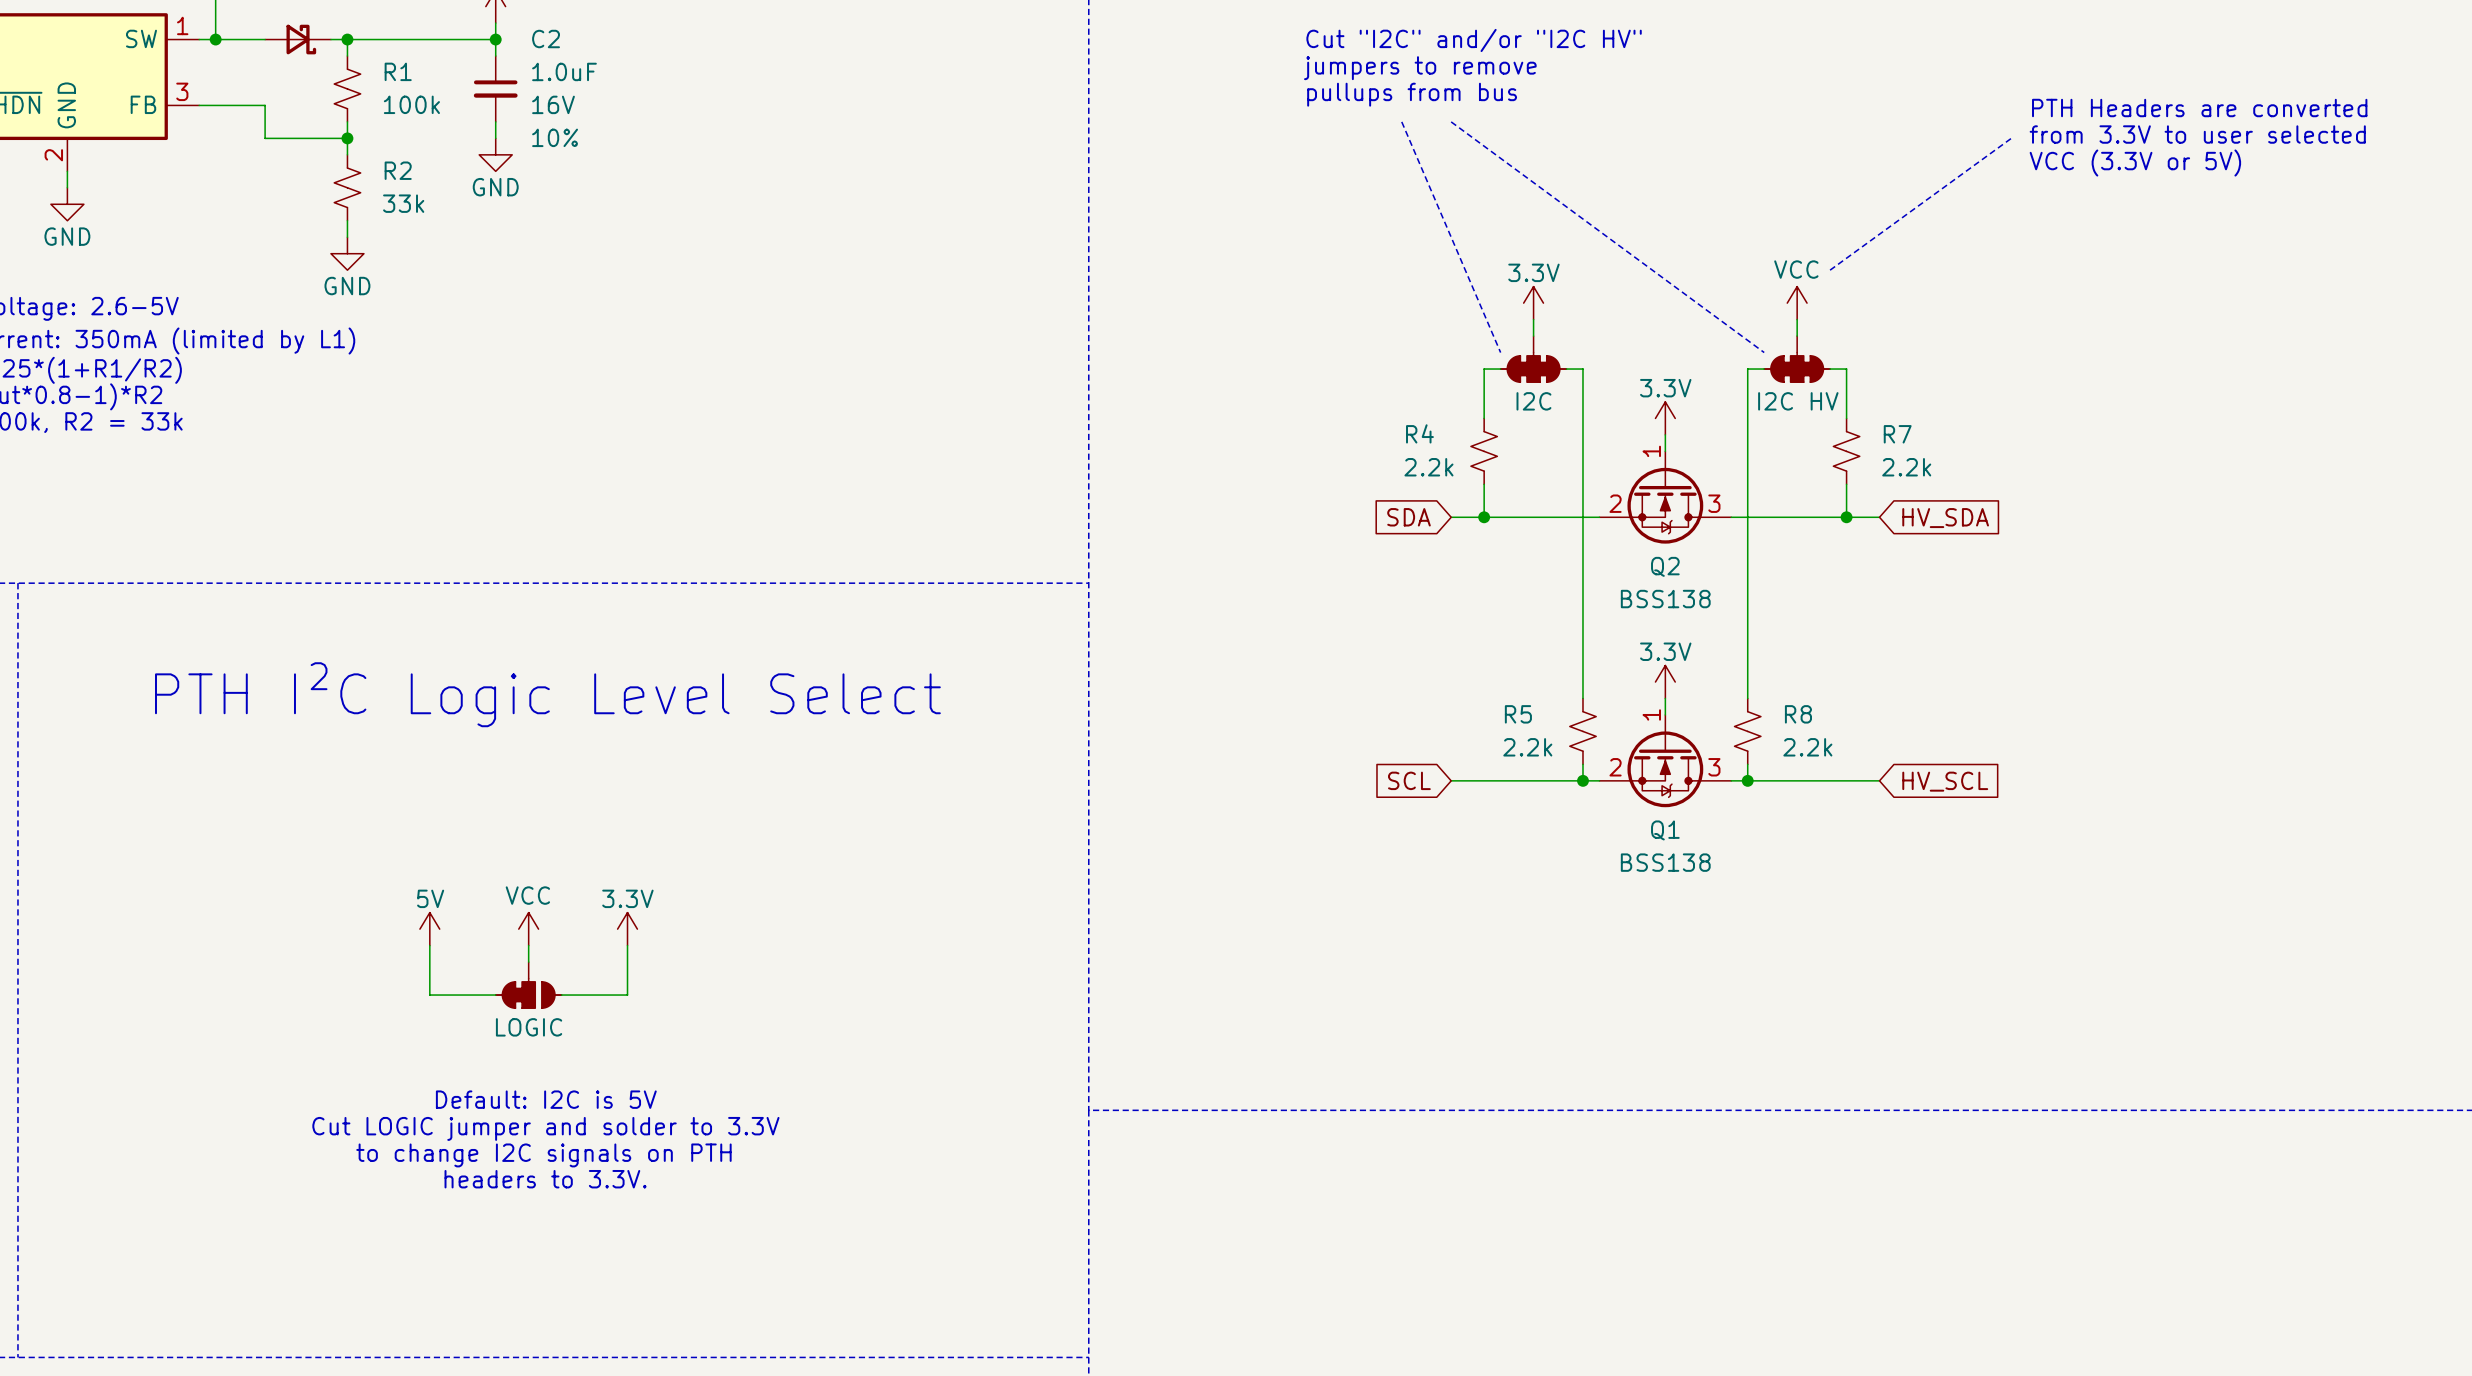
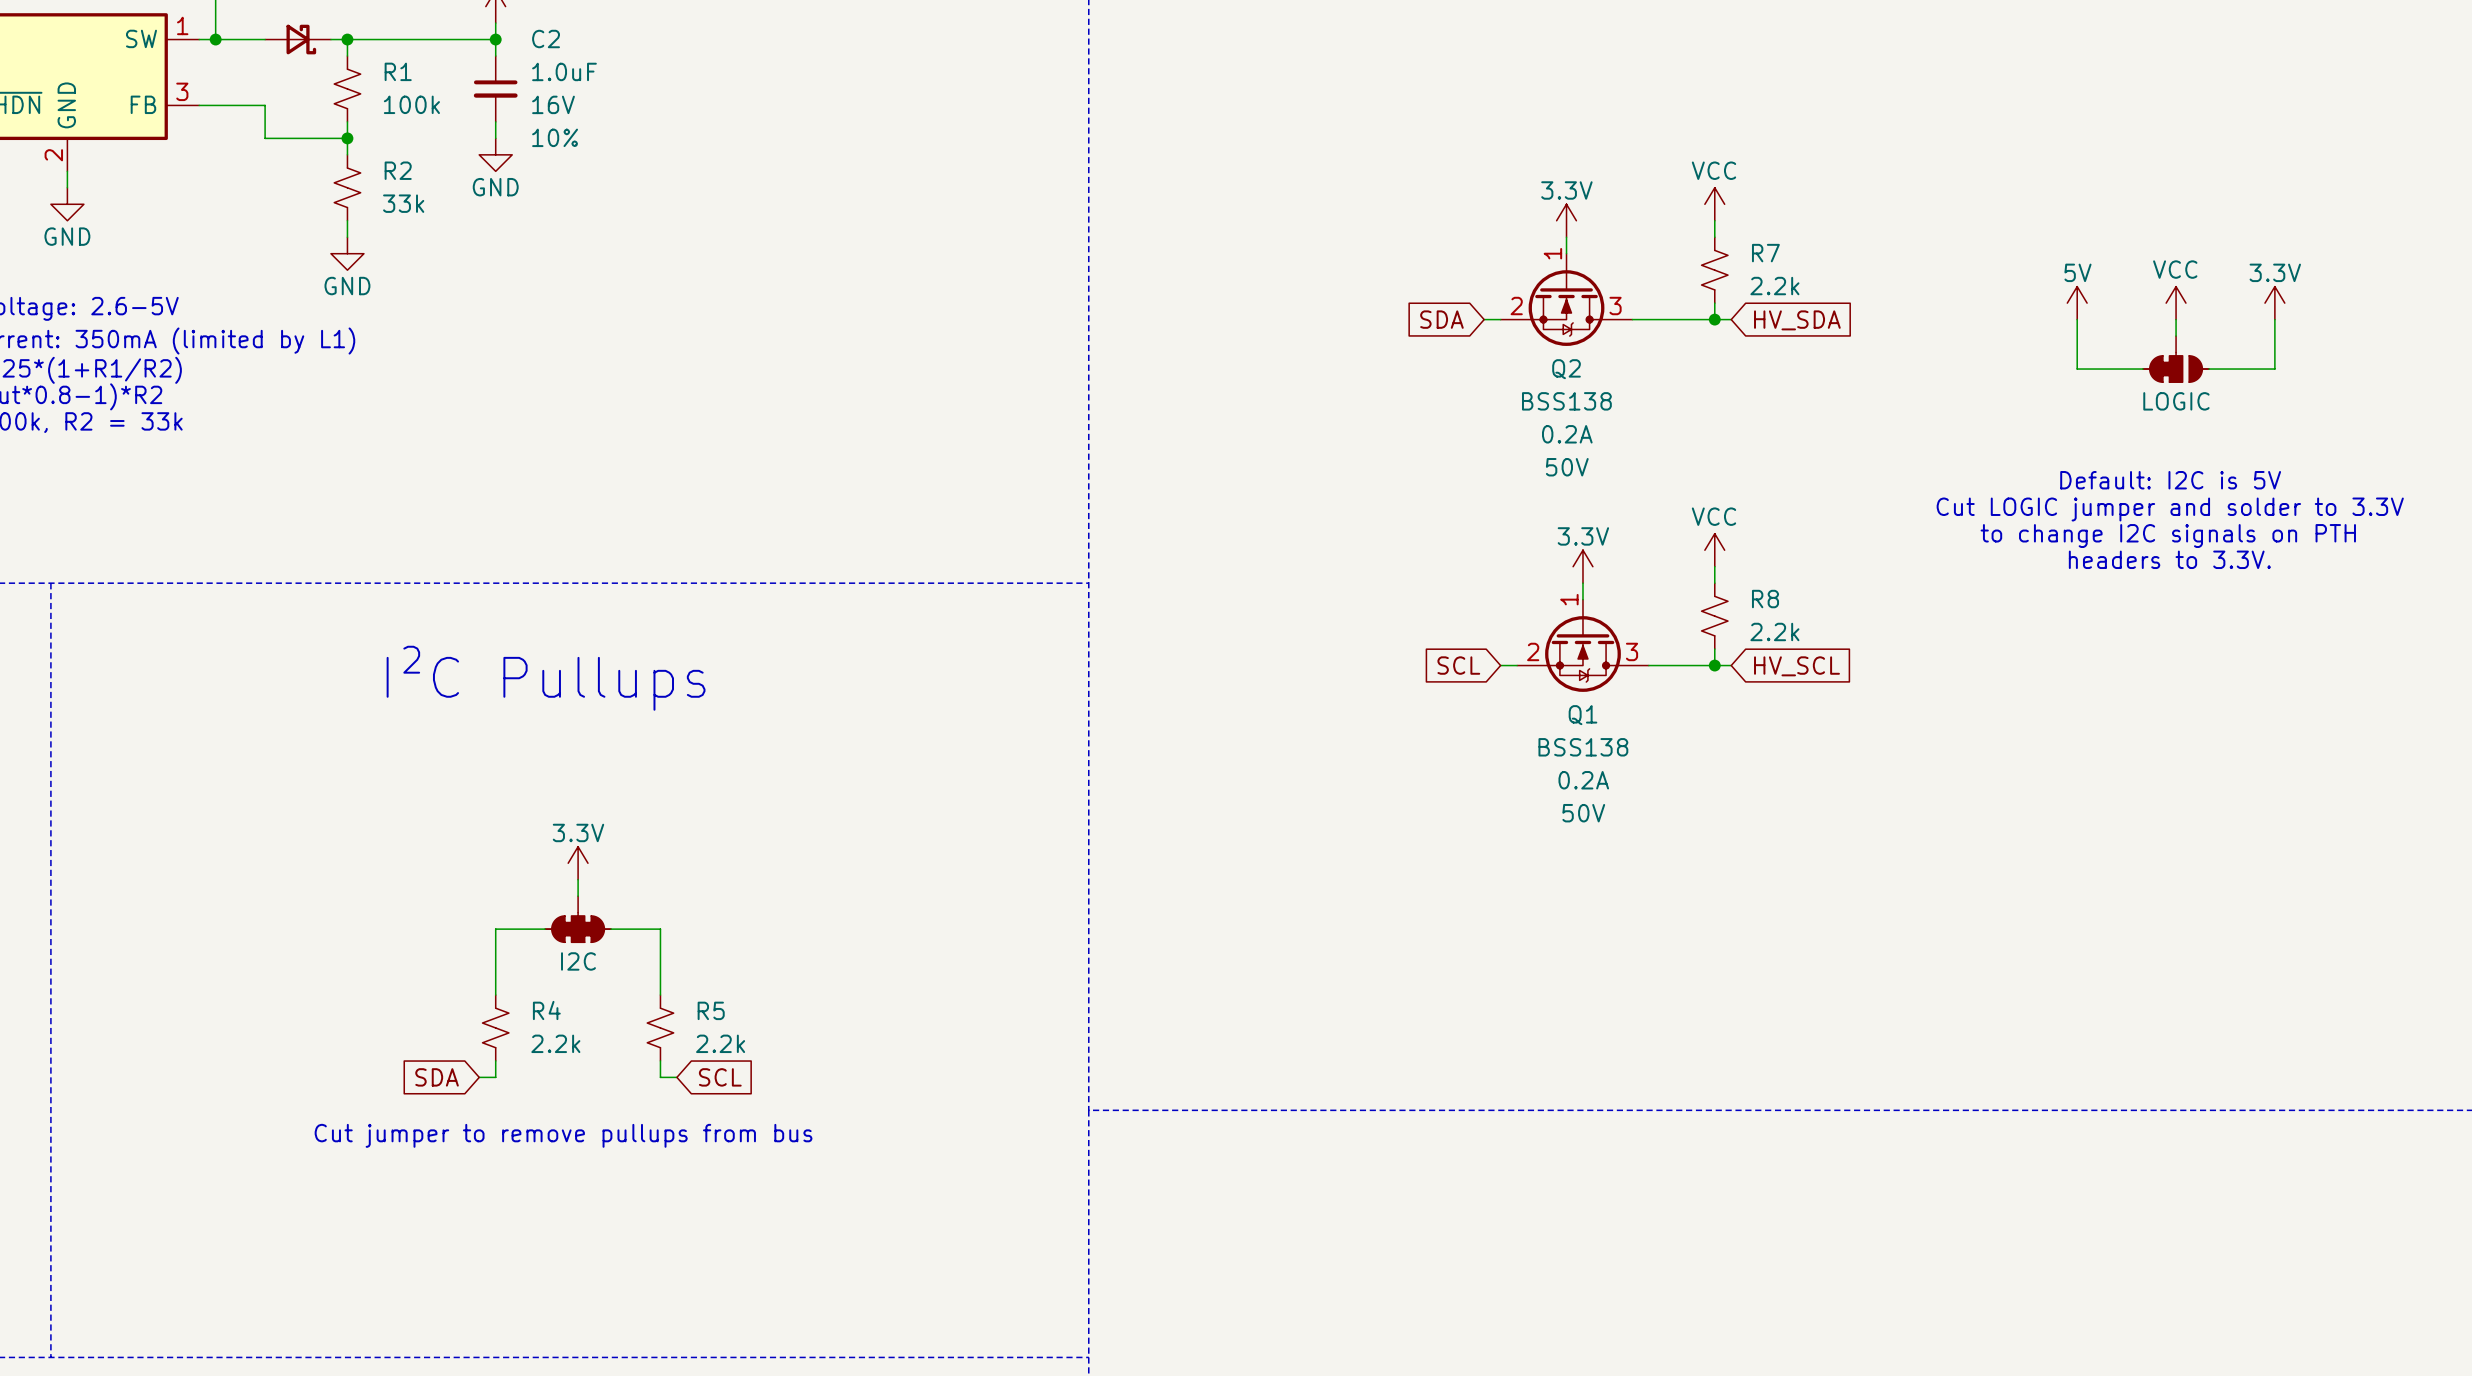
text: Cut "I2C" and/or "I2C HV" (1474, 40) -> none
text: jumpers to remove (1420, 68) -> none
text: pullups from bus (1412, 94) -> none
text: PTH Headers are converted (2199, 108) -> none
line: (1401, 121) (1500, 352) -> none
line: (1451, 121) (1764, 352) -> none
text: from 3.3V to user selected (2197, 134) -> none
line: (2011, 138) (1830, 270) -> none
text: VCC (3.3V or 5V) (2135, 163) -> none
power symbol position: 3.3V (1533, 303) -> 3.3V (1566, 220)
power symbol position: VCC (1797, 303) -> VCC (1714, 204)
power symbol: none -> 5V (2077, 303)
power symbol: none -> VCC (2176, 303)
power symbol: none -> 3.3V (2274, 303)
wire: none -> (1484, 319) (1500, 319)
wire: (1533, 319) (1533, 336) -> (1566, 237) (1566, 253)
wire: none -> (1632, 319) (1731, 319)
junction: none -> (1714, 319)
wire: (1797, 319) (1797, 336) -> (1714, 220) (1714, 237)
wire: none -> (2077, 319) (2077, 369) (2143, 369)
wire: none -> (2176, 319) (2176, 336)
wire: none -> (2274, 319) (2274, 369) (2208, 369)
part: I2C (1533, 359) -> none
part: I2C HV (1797, 359) -> none
part: none -> LOGIC (2176, 359)
wire: (1500, 369) (1484, 369) (1484, 418) -> none
wire: (1566, 369) (1582, 369) (1582, 583) -> none
wire: (1764, 369) (1747, 369) (1747, 698) -> none
wire: (1830, 369) (1846, 369) (1846, 418) -> none
power symbol: 3.3V (1665, 418) -> none
R4 name position: R4 (1419, 433) -> R4 (546, 1010)
Q2 text: none -> 0.2A (1567, 434)
wire: (1665, 434) (1665, 451) -> (1714, 303) (1714, 319)
R4 position: (1484, 451) -> (495, 1027)
R7 position: (1846, 451) -> (1714, 270)
R4 value position: 2.2k (1428, 467) -> 2.2k (555, 1043)
Q2 text: none -> 50V (1567, 467)
text: none -> Default: I2C is 5V (2170, 480)
wire: (1484, 484) (1484, 517) -> none
wire: (1846, 484) (1846, 517) -> none
Q2 position: (1665, 497) -> (1566, 299)
text: none -> Cut LOGIC jumper and solder to 3.3V (2170, 509)
global label position: SDA (1409, 517) -> SDA (1441, 319)
wire: (1451, 517) (1599, 517) -> none
junction: (1484, 517) -> none
wire: (1731, 517) (1879, 517) -> none
junction: (1846, 517) -> none
global label position: HV_SDA (1945, 518) -> HV_SDA (1797, 320)
text: none -> to change I2C signals on PTH (2168, 536)
power symbol: none -> VCC (1714, 550)
text: none -> headers to 3.3V. (2169, 559)
power symbol: none -> 3.3V (1582, 566)
line: (17, 583) (17, 1357) -> (50, 583) (50, 1357)
wire: none -> (1500, 665) (1517, 665)
wire: none -> (1648, 665) (1731, 665)
junction: none -> (1714, 665)
text: none -> I²C Pullups (546, 678)
power symbol: 3.3V (1665, 682) -> none
text: PTH I²C Logic Level Select (547, 694) -> none
wire: (1665, 698) (1665, 714) -> (1714, 566) (1714, 583)
R5 name position: R5 (1518, 714) -> R5 (711, 1010)
R5 position: (1582, 731) -> (660, 1027)
R8 position: (1747, 731) -> (1714, 616)
R5 value position: 2.2k (1527, 747) -> 2.2k (720, 1043)
Q1 position: (1665, 761) -> (1582, 645)
wire: (1582, 764) (1582, 780) -> none
wire: (1747, 764) (1747, 780) -> (1714, 649) (1714, 665)
global label position: SCL (1409, 780) -> SCL (1458, 665)
wire: (1451, 780) (1599, 780) -> none
junction: (1582, 780) -> none
Q1 text: none -> 0.2A (1583, 780)
wire: (1731, 780) (1879, 780) -> none
junction: (1747, 780) -> none
global label position: HV_SCL (1945, 781) -> HV_SCL (1796, 666)
Q1 text: none -> 50V (1583, 813)
part: none -> I2C (578, 919)
power symbol: 5V (429, 929) -> none
power symbol: VCC (528, 929) -> none
wire: none -> (611, 929) (660, 929) (660, 995)
power symbol position: 3.3V (627, 929) -> 3.3V (578, 863)
wire: (429, 945) (429, 995) (495, 995) -> (545, 929) (495, 929) (495, 995)
wire: (528, 945) (528, 962) -> (578, 879) (578, 896)
wire: (627, 945) (627, 995) (561, 995) -> none
part: LOGIC (528, 985) -> none
wire: none -> (495, 1060) (495, 1077) (479, 1077)
wire: none -> (660, 1060) (660, 1077) (676, 1077)
global label: none -> SDA (437, 1077)
global label: none -> SCL (720, 1077)
text: Default: I2C is 5V (546, 1099) -> none
text: Cut LOGIC jumper and solder to 3.3V (545, 1128) -> none
text: none -> Cut jumper to remove pullups from bus (563, 1135)
text: to change I2C signals on PTH (543, 1155) -> none
text: headers to 3.3V. (545, 1179) -> none

